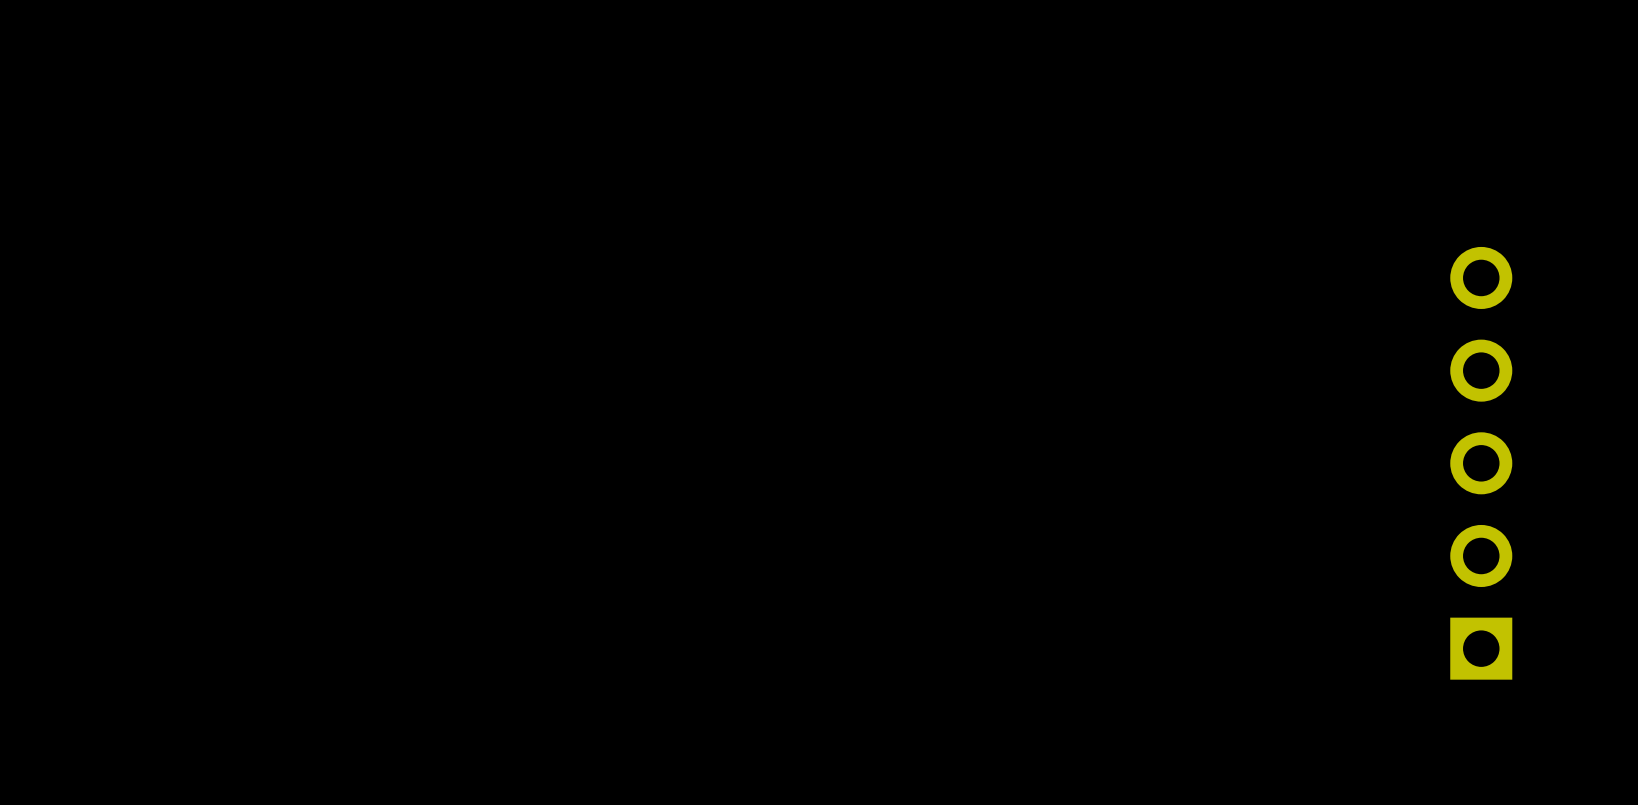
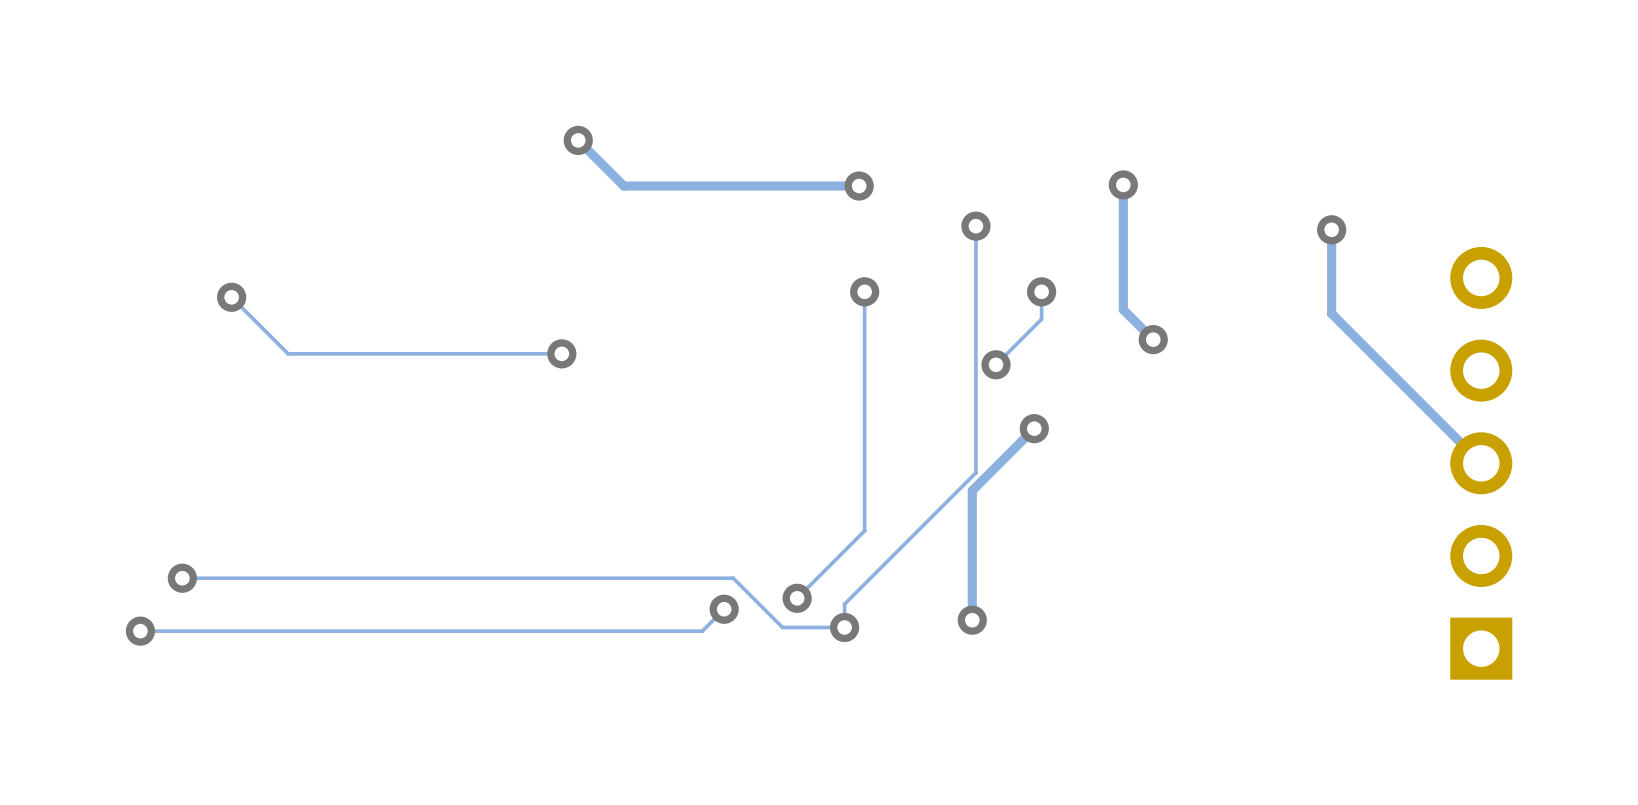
track: none -> (578, 140) (623, 186) (859, 186)
via: none -> (578, 140)
track: none -> (1123, 184) (1123, 309) (1153, 339)
via: none -> (1123, 184)
via: none -> (859, 186)
track: none -> (975, 226) (975, 472) (844, 604) (844, 627) (782, 627) (733, 578) (182, 578)
via: none -> (975, 226)
track: none -> (1331, 229) (1331, 313) (1481, 463)
via: none -> (1331, 229)
track: none -> (864, 291) (864, 530) (797, 598)
via: none -> (864, 291)
track: none -> (1041, 291) (1041, 319) (996, 364)
via: none -> (1041, 291)
track: none -> (231, 297) (288, 353) (561, 353)
via: none -> (231, 297)
via: none -> (1153, 339)
via: none -> (561, 353)
via: none -> (996, 364)
track: none -> (1034, 428) (972, 490) (972, 620)
via: none -> (1034, 428)
via: none -> (182, 578)
via: none -> (797, 598)
track: none -> (724, 609) (702, 631) (140, 631)
via: none -> (724, 609)
via: none -> (972, 620)
via: none -> (844, 627)
via: none -> (140, 631)

